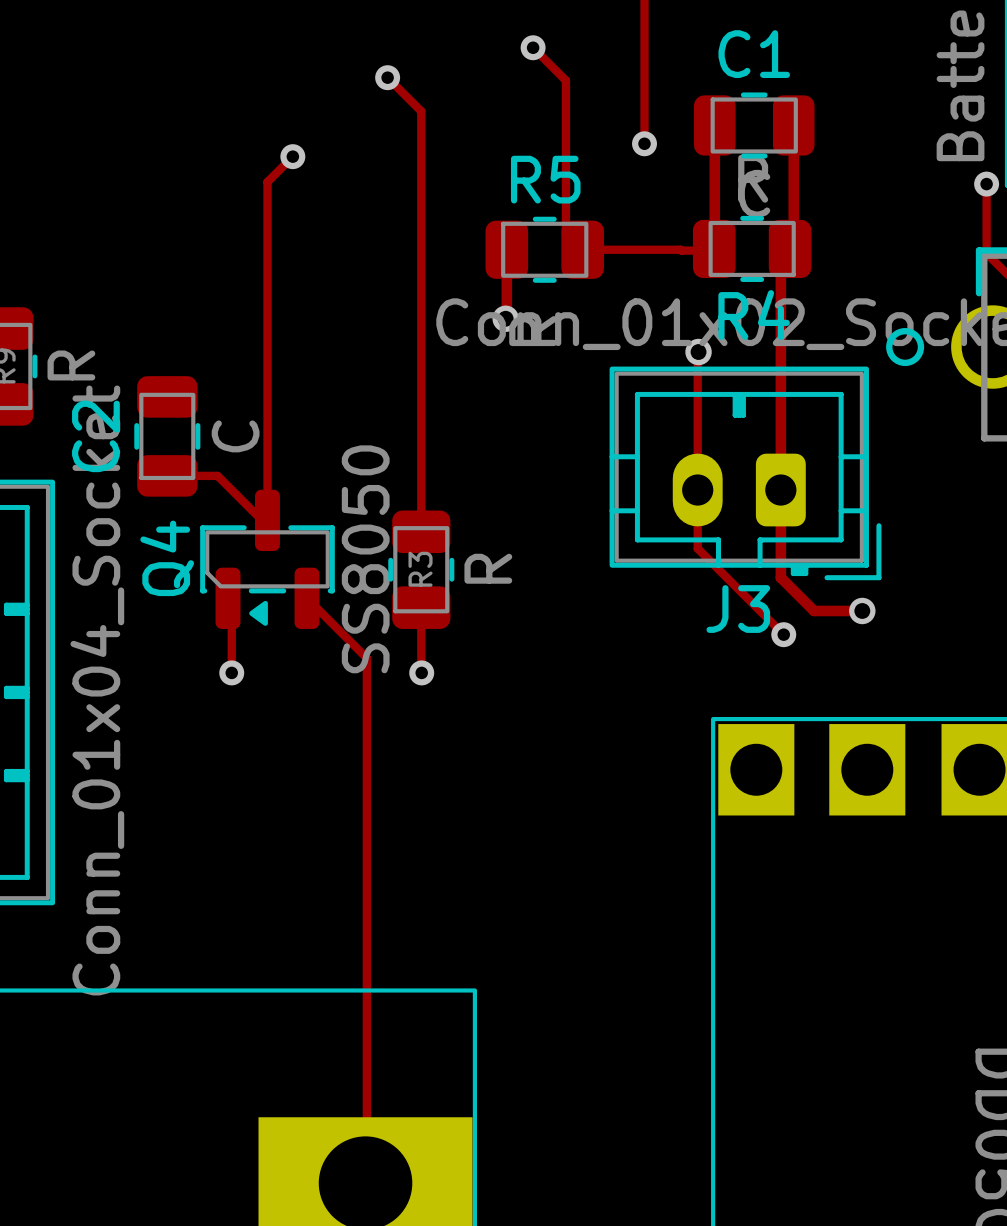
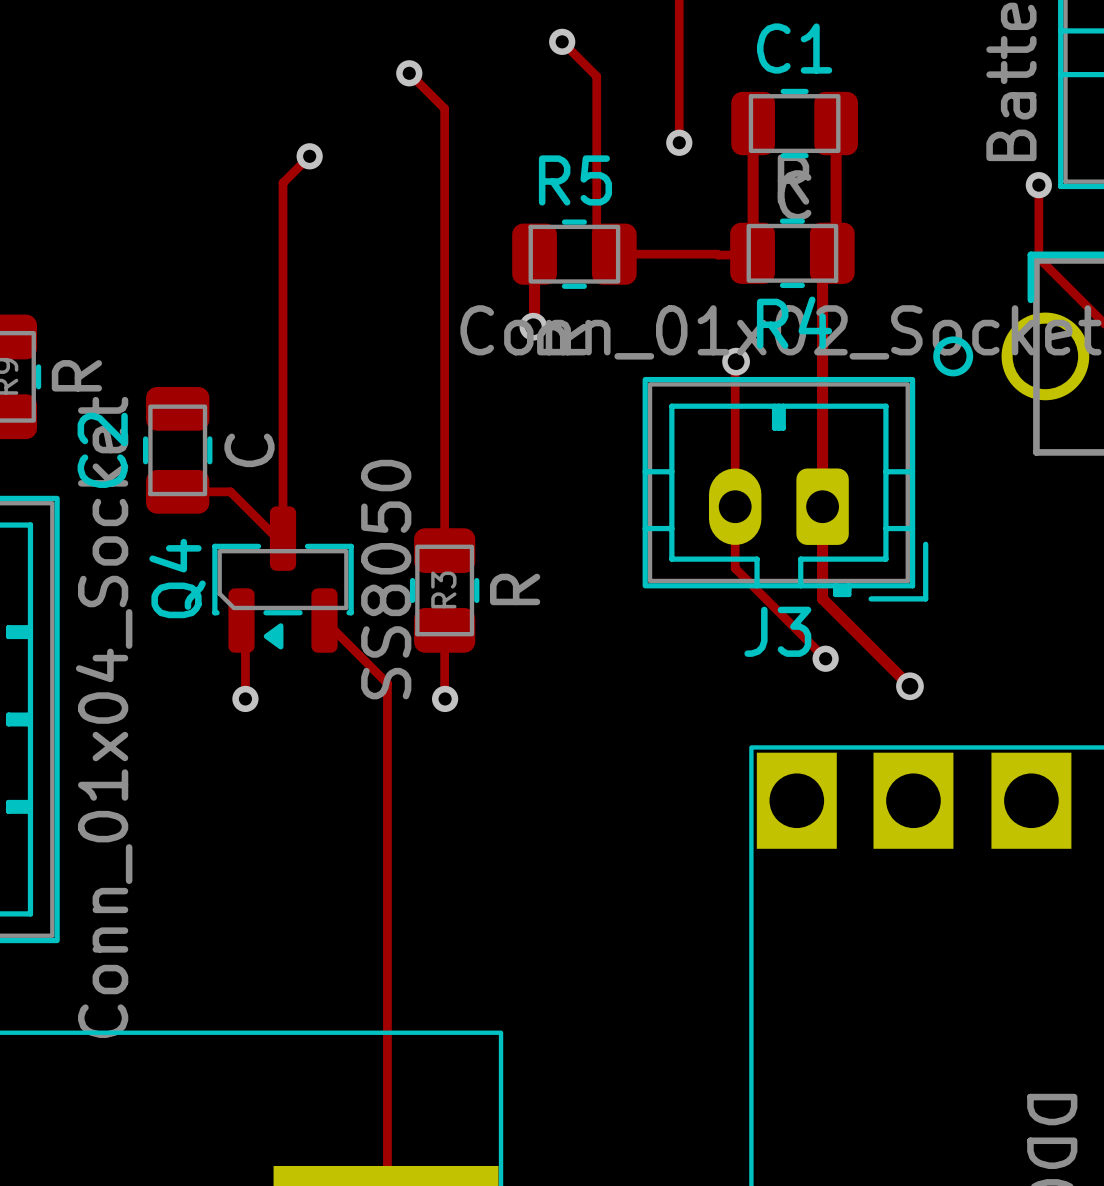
track: (814, 610) (862, 610) -> (857, 633) (909, 686)
via position: (862, 610) -> (909, 686)

